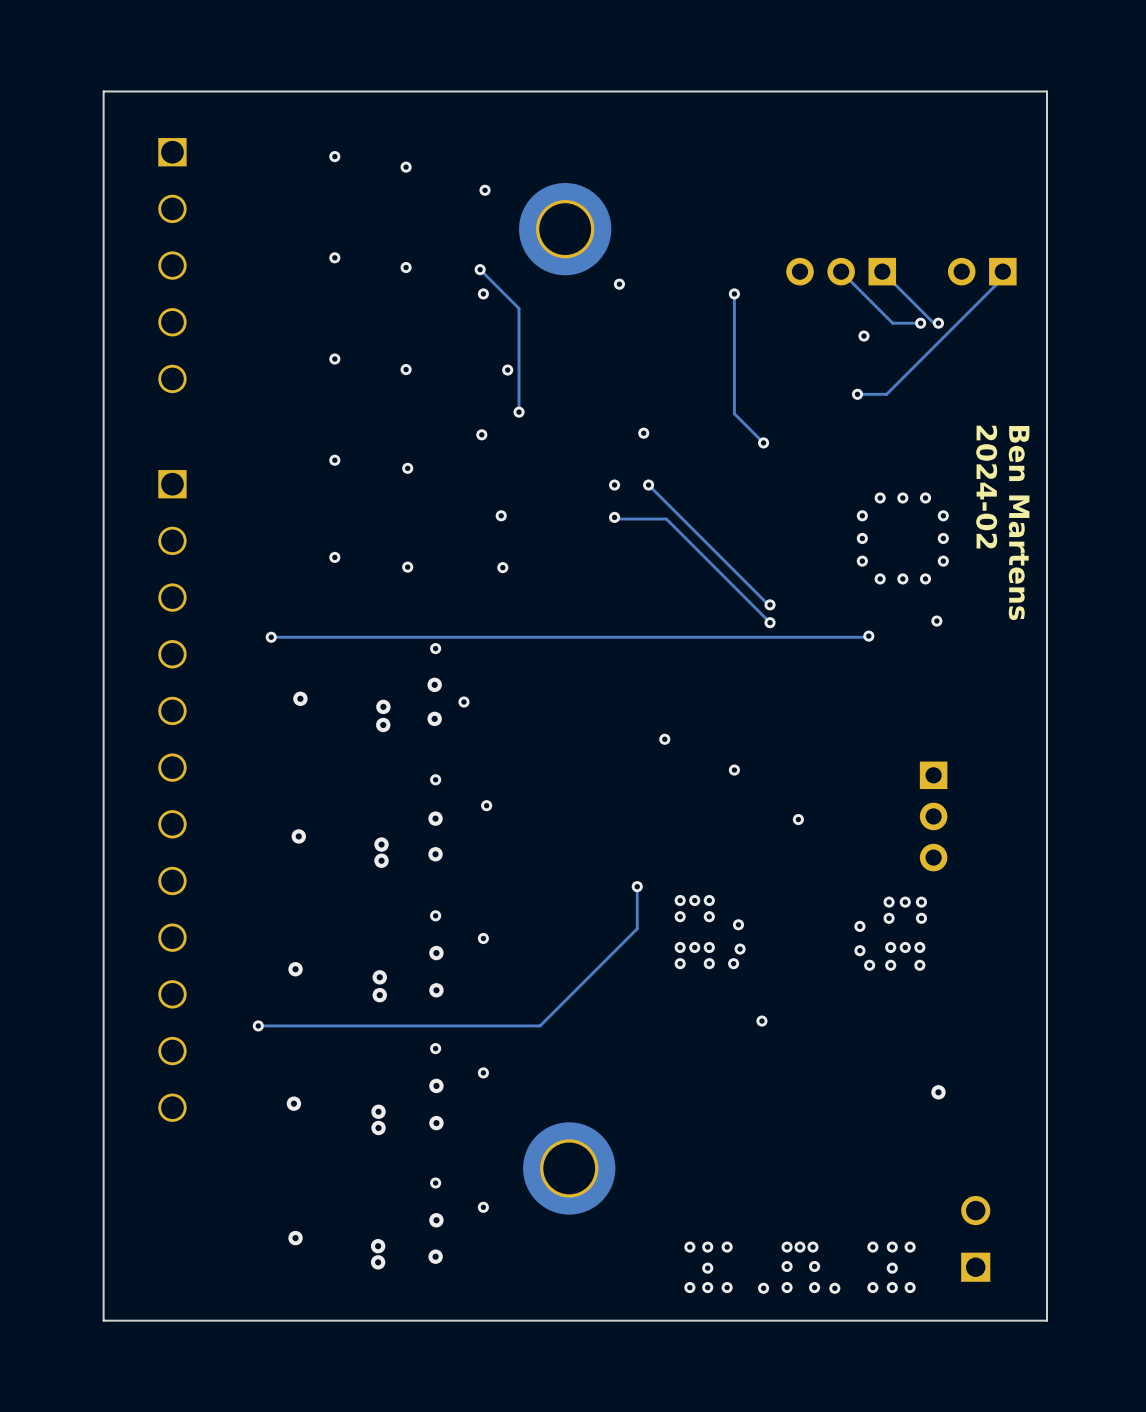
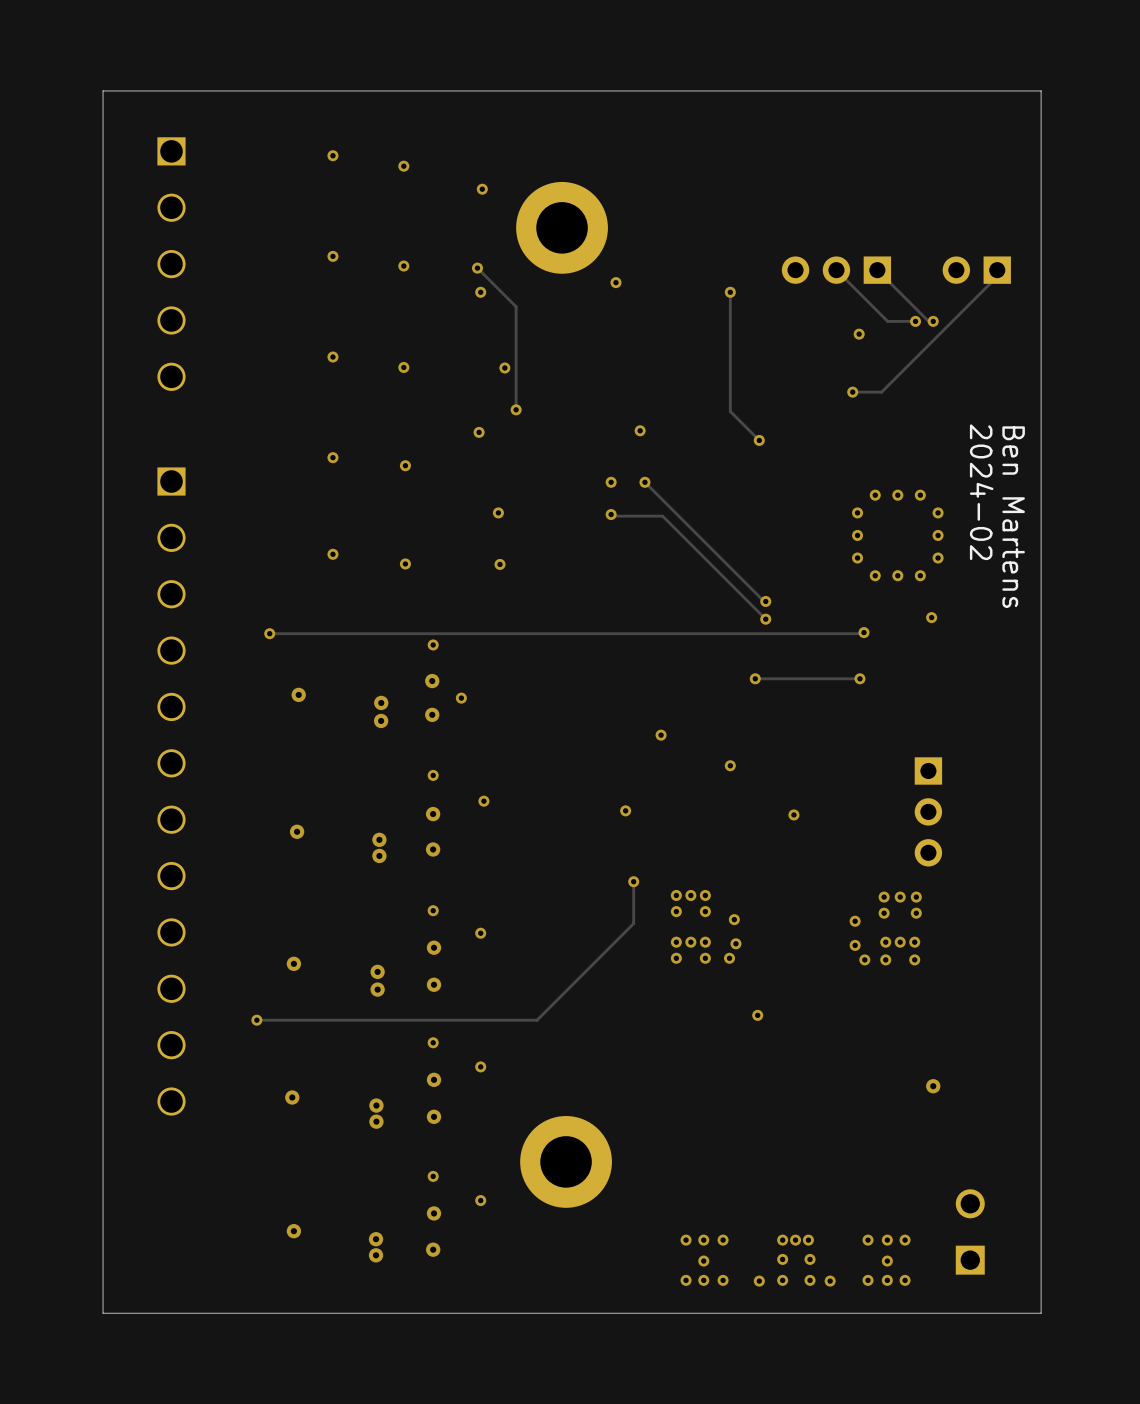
via: none -> (755, 678)
track: none -> (859, 678) (755, 678)
via: none -> (859, 678)
via: none -> (625, 810)

